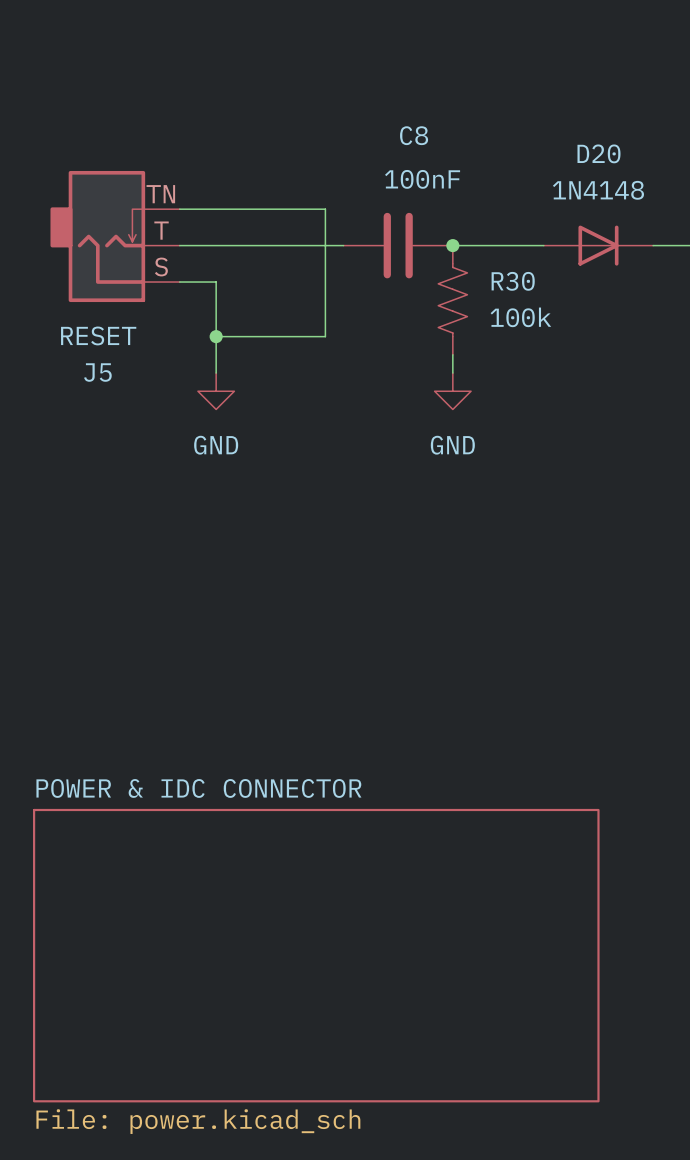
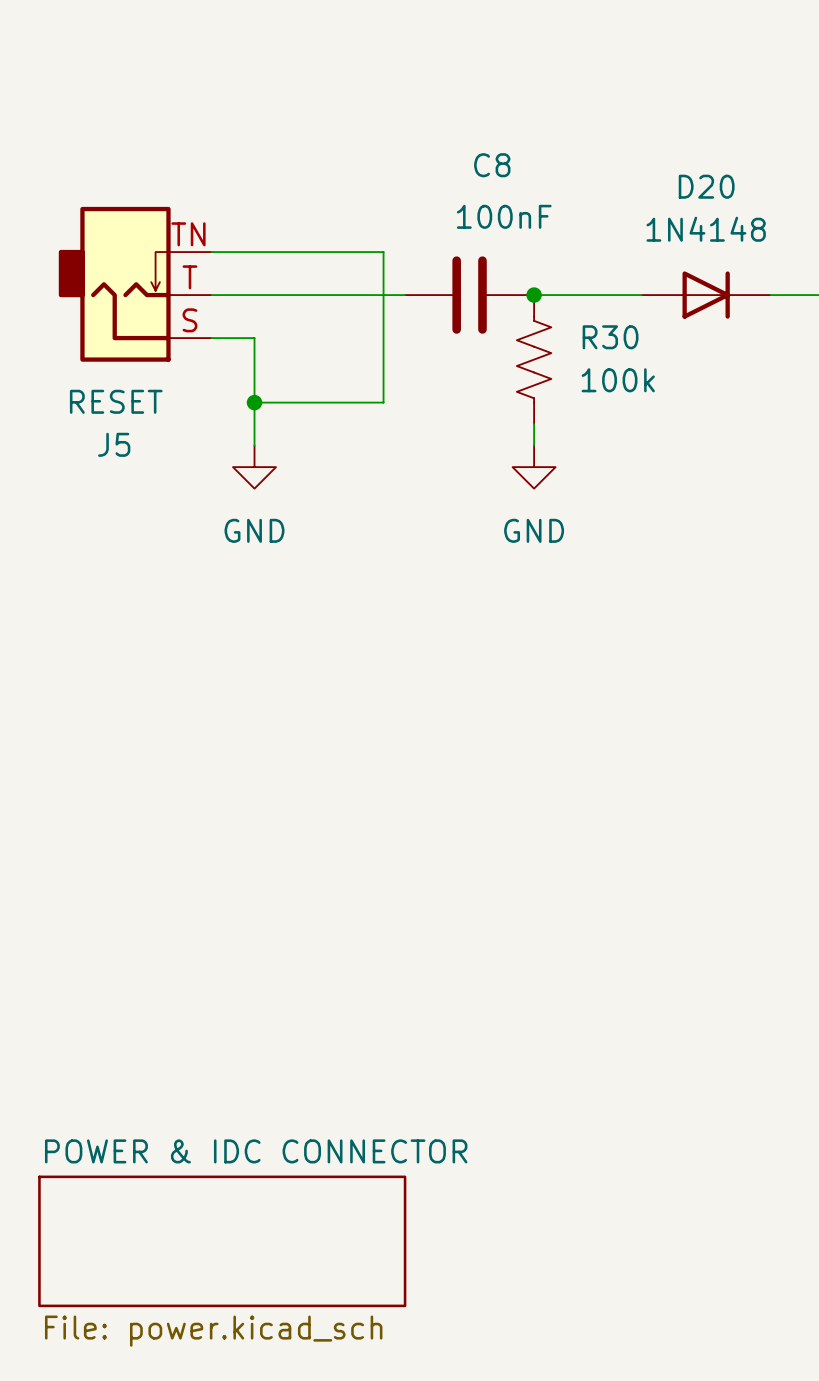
sheet POWER & IDC CONNECTOR: File: power.kicad_sch (316, 955) -> none
sheet POWER & IDC CONNECTOR: none -> File: power.kicad_sch (222, 1241)

